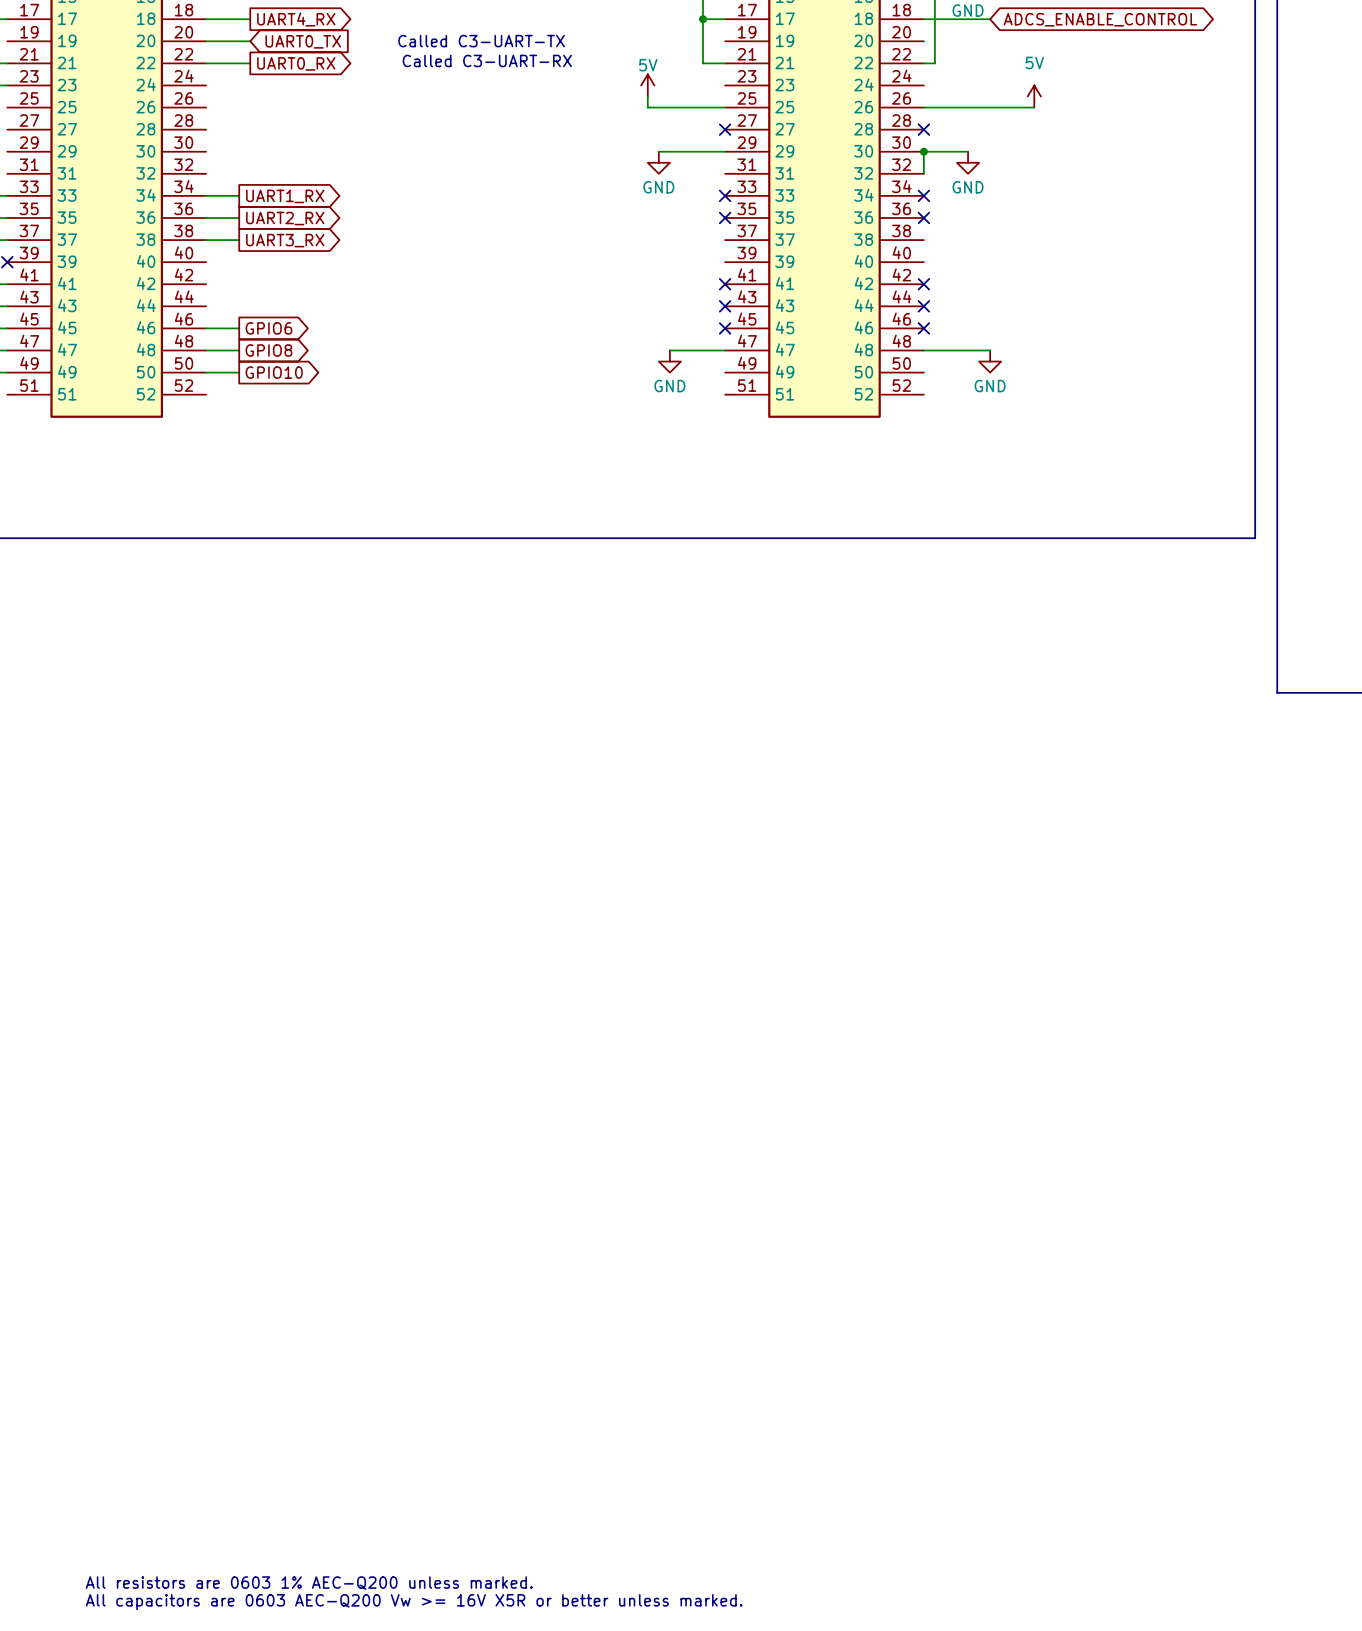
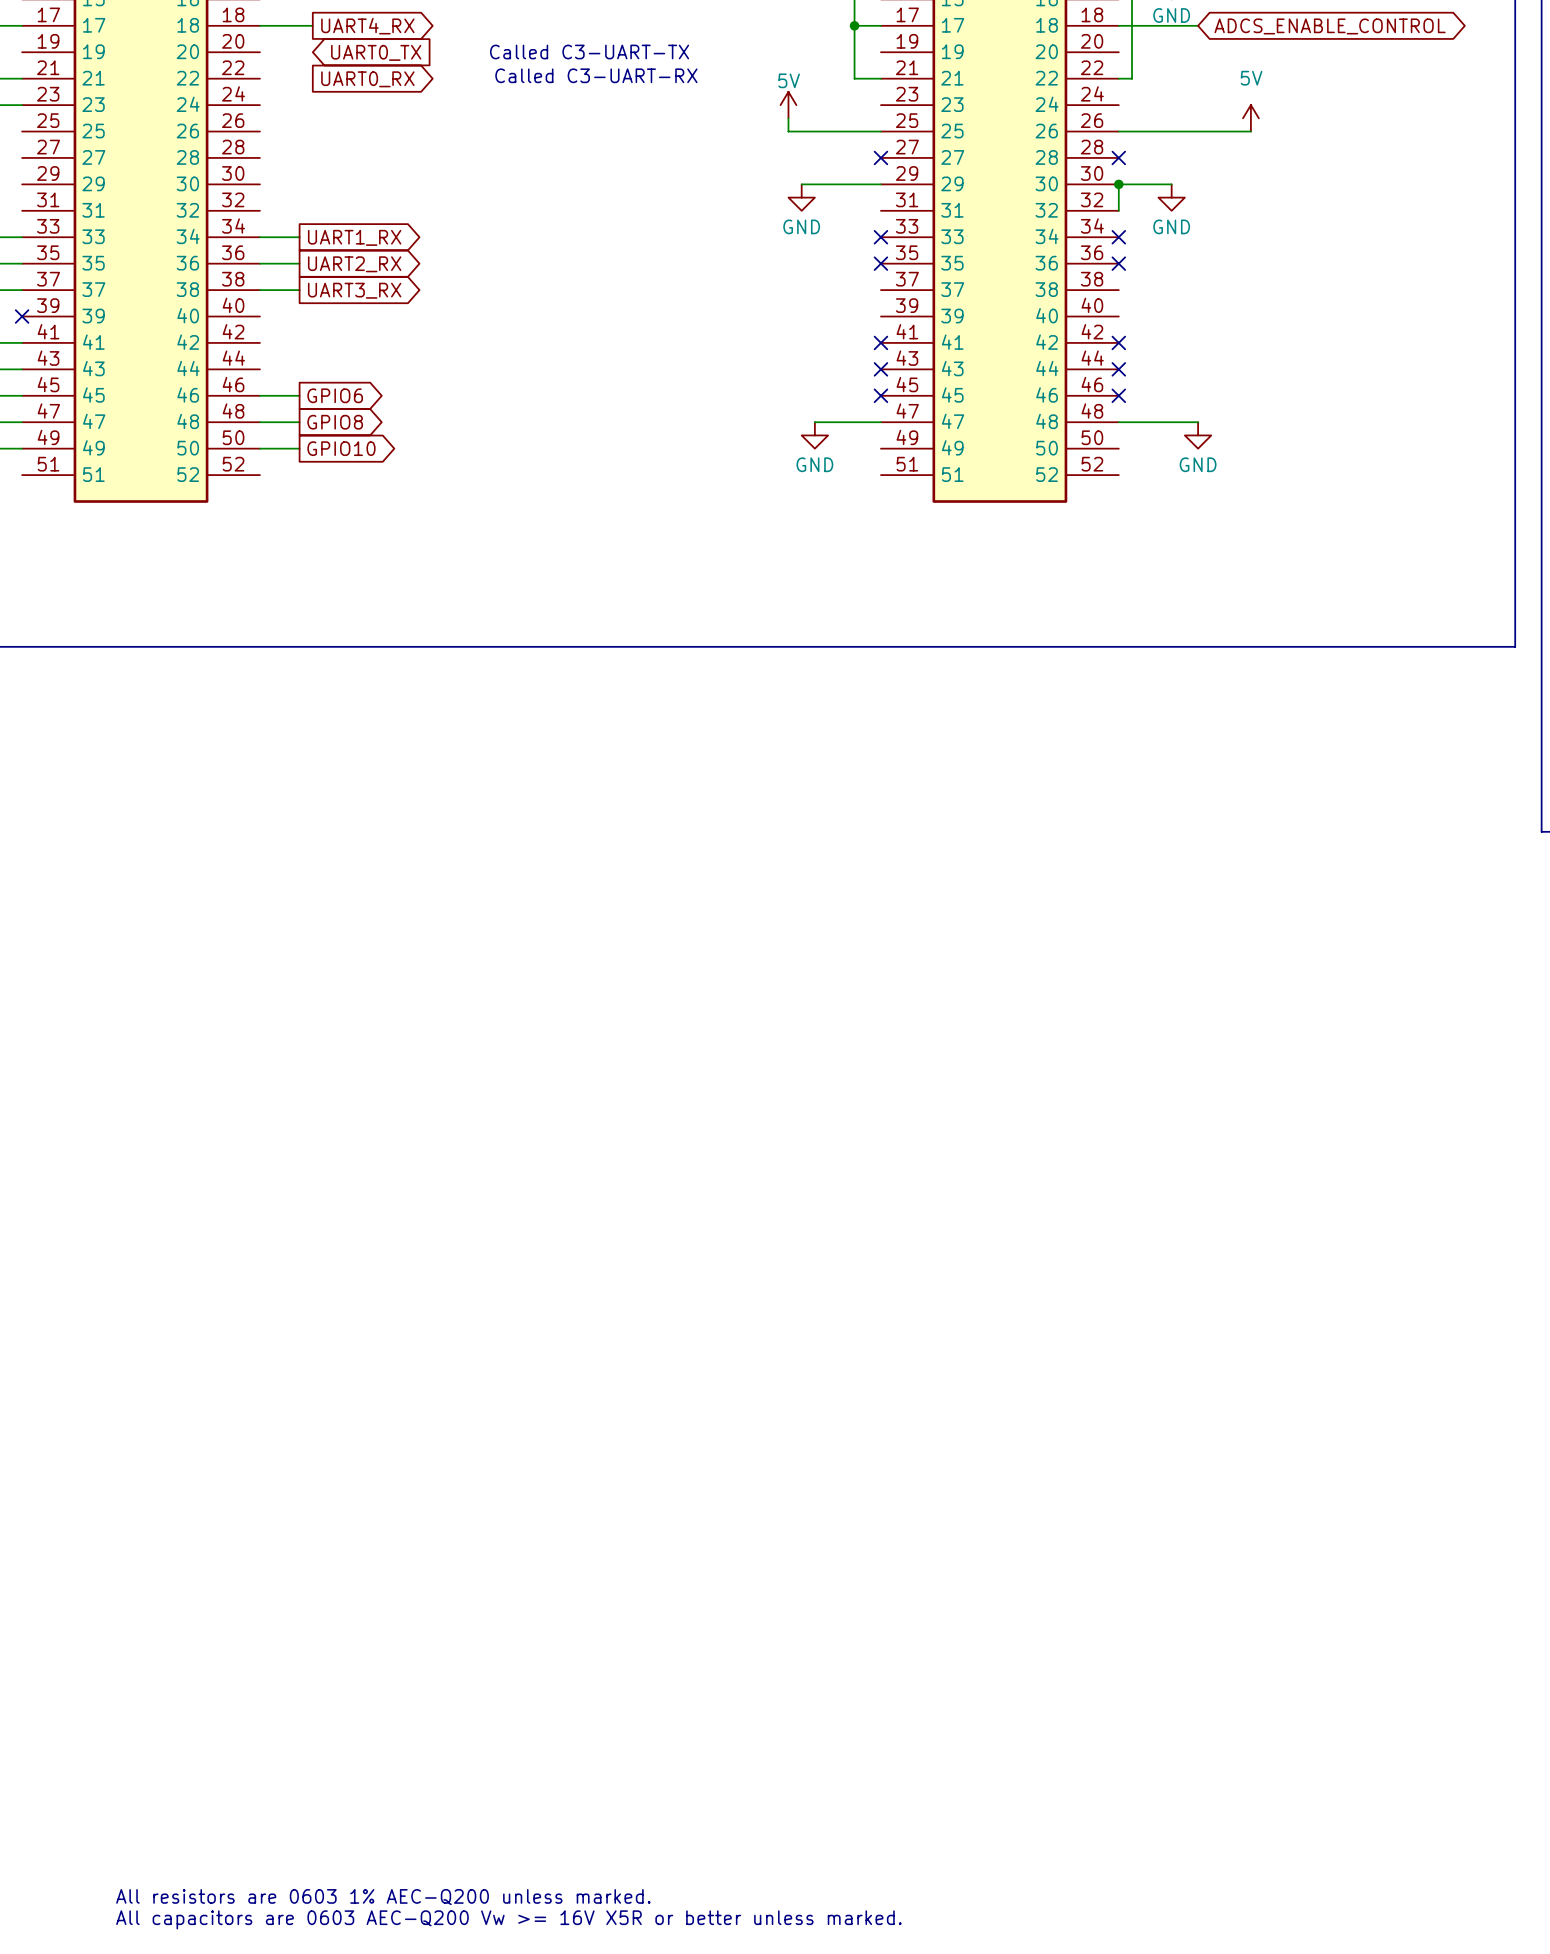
wire: (206, 41) (250, 41) -> none
wire: (206, 63) (250, 63) -> none

